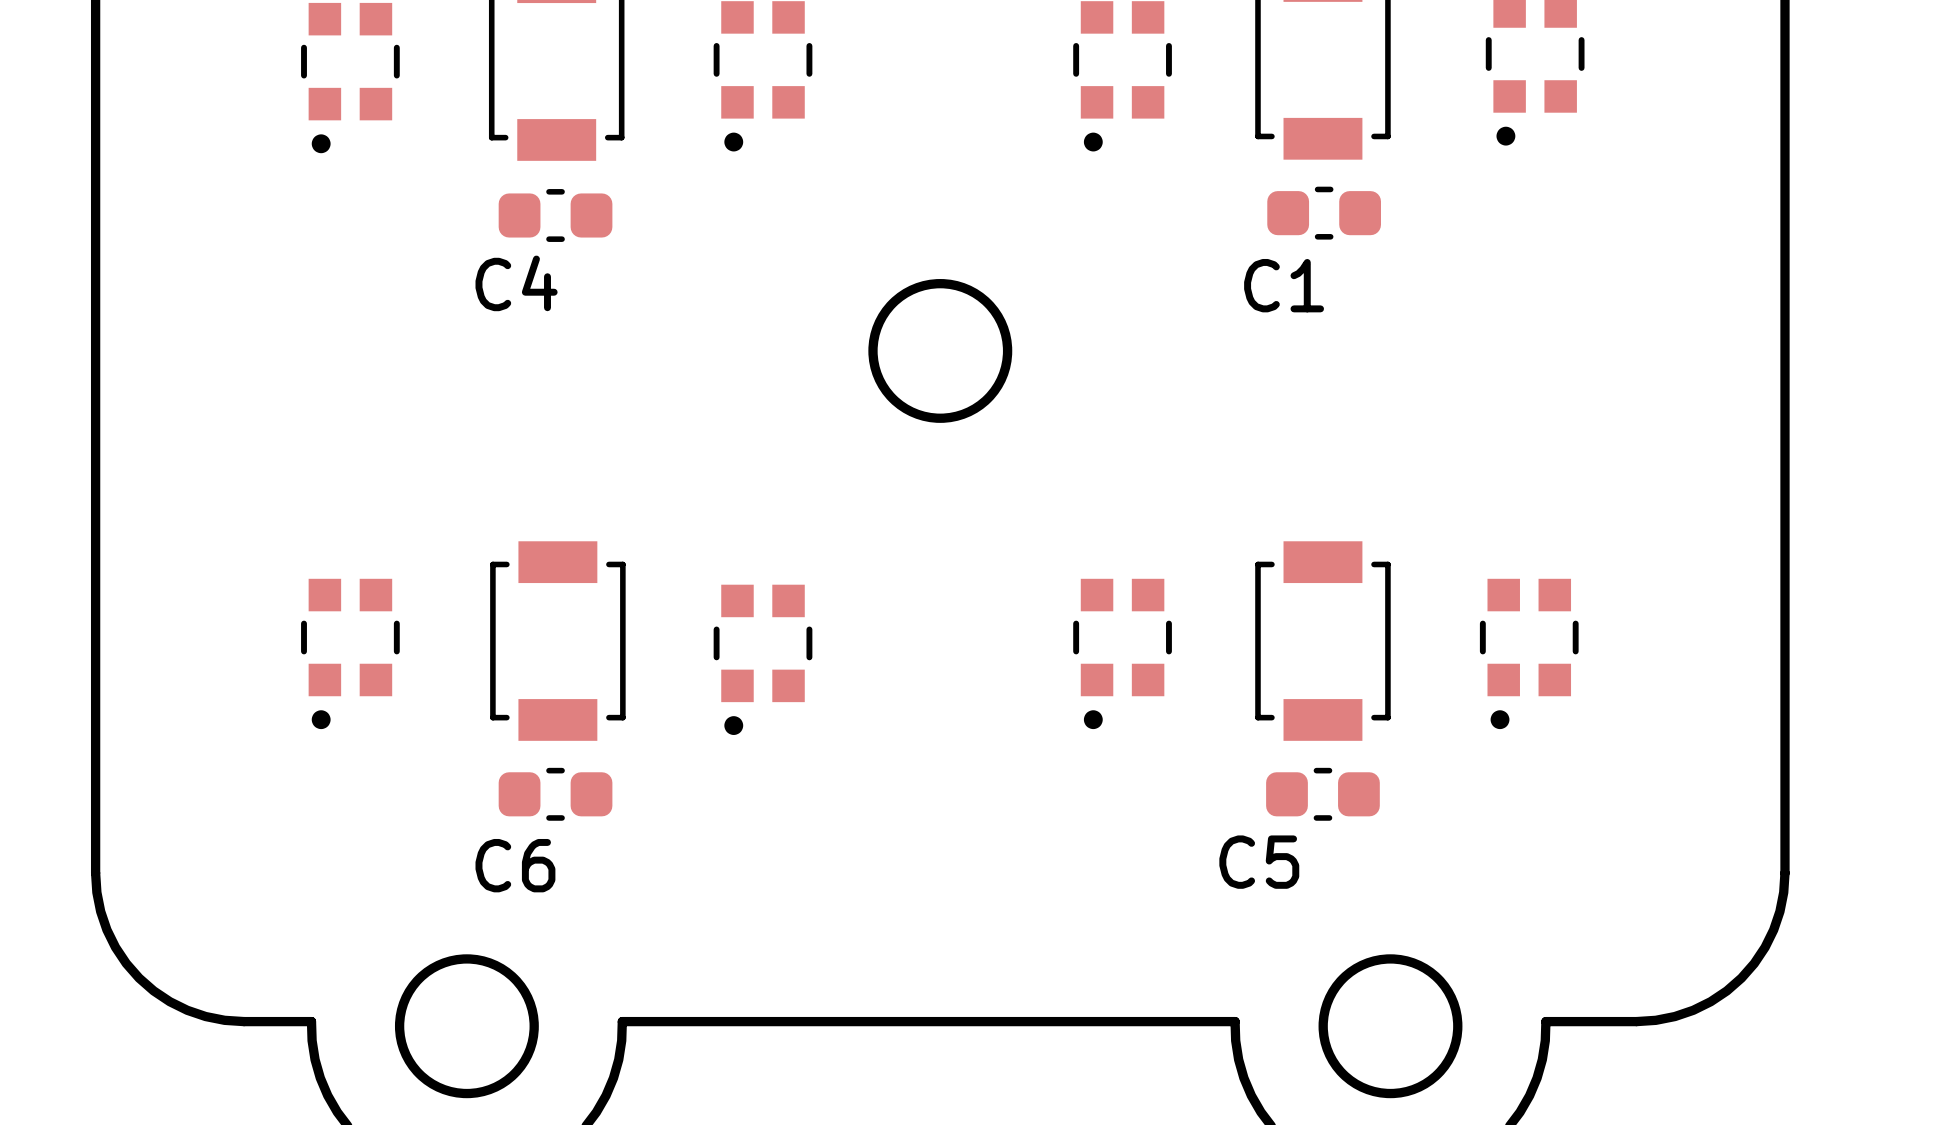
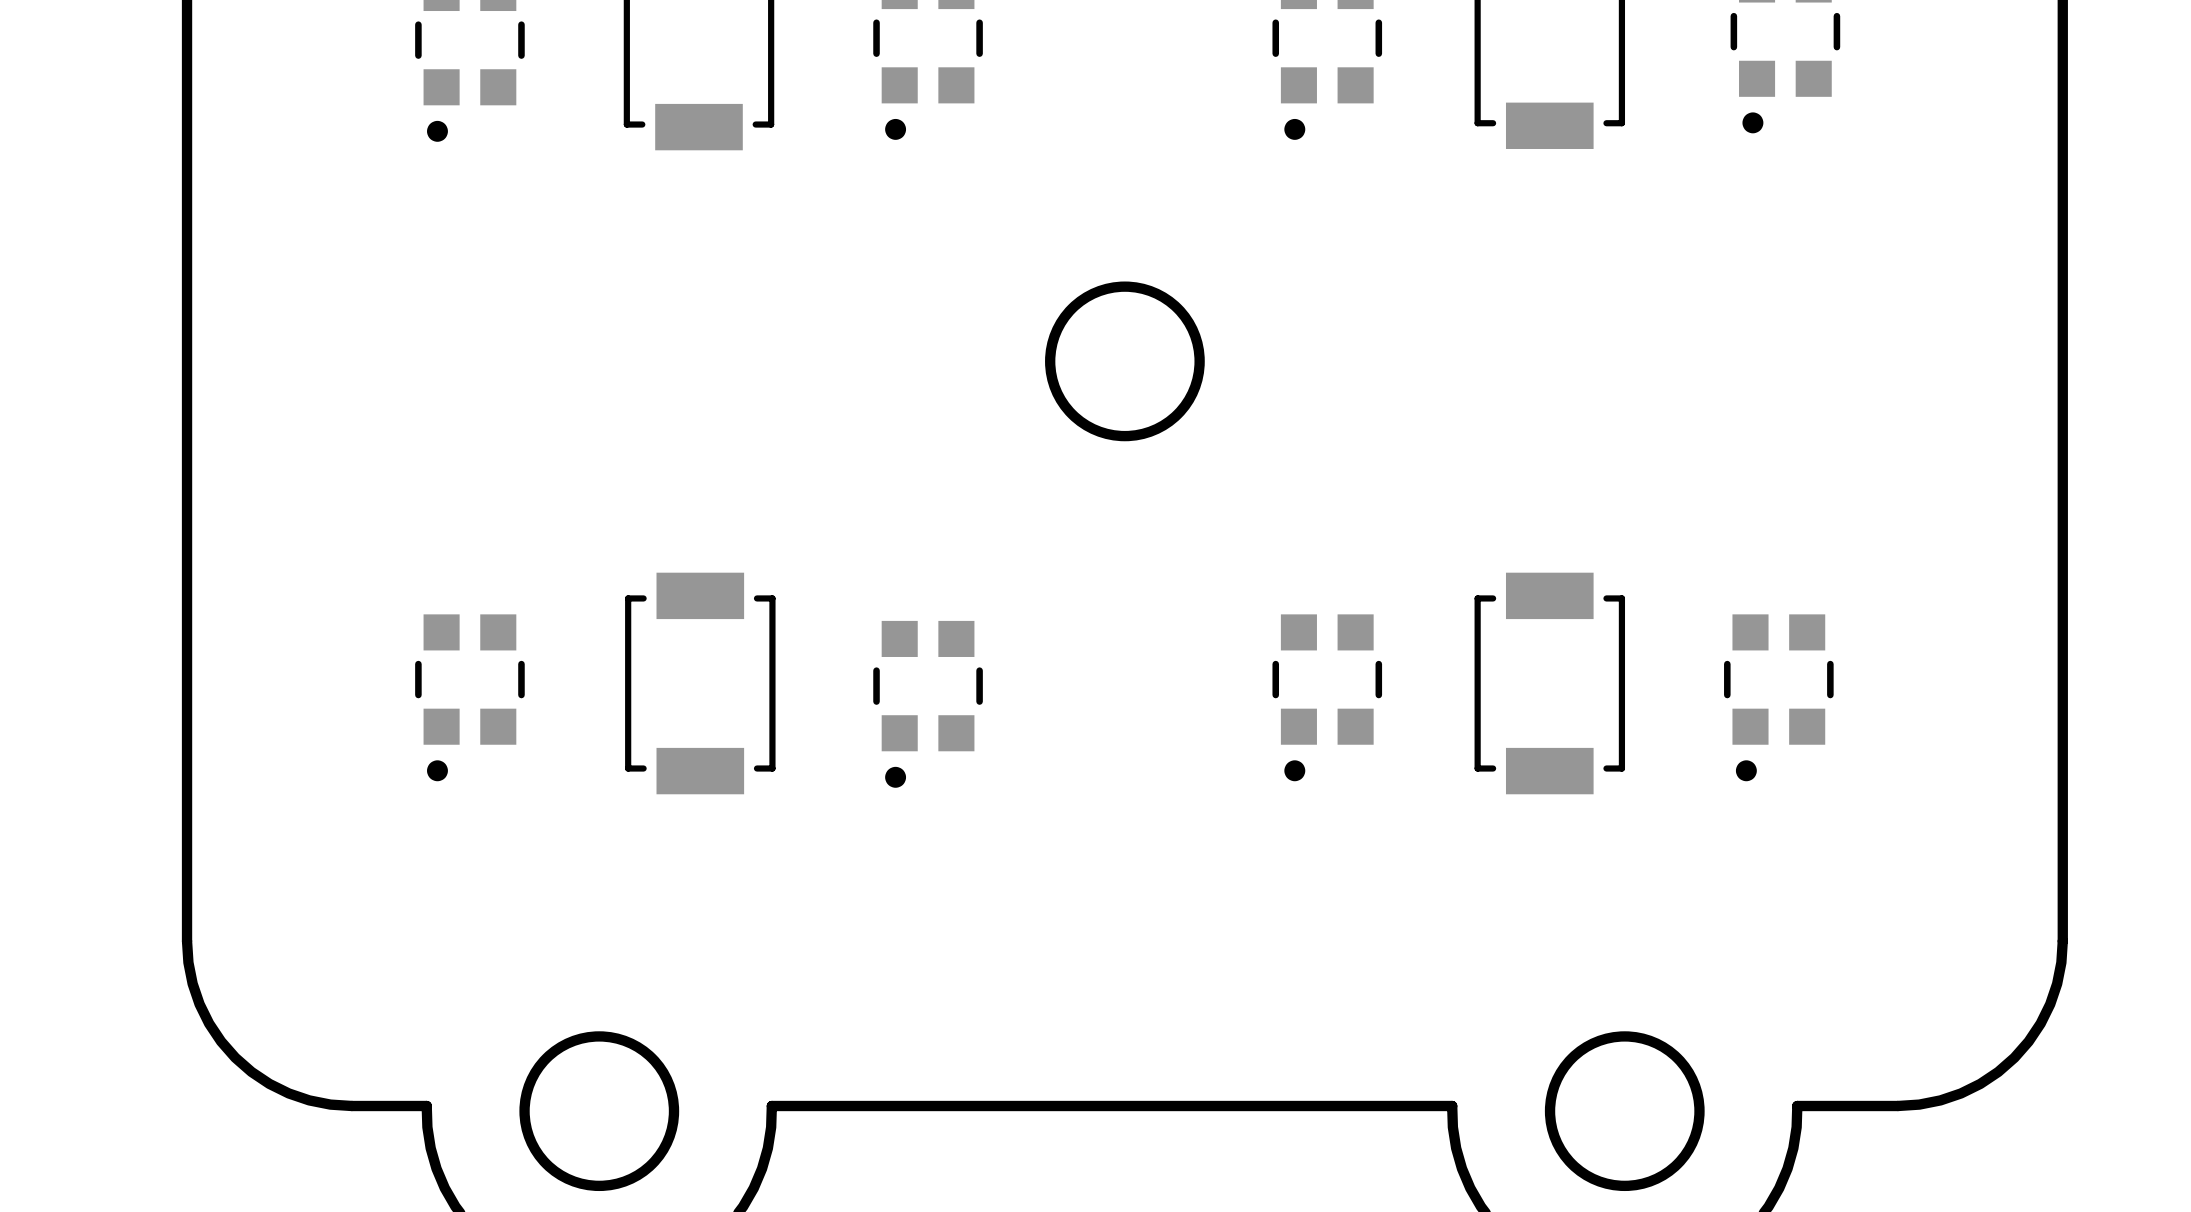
C1: (1324, 213) -> none
C4: (555, 215) -> none
C6: (555, 794) -> none
C5: (1322, 794) -> none

